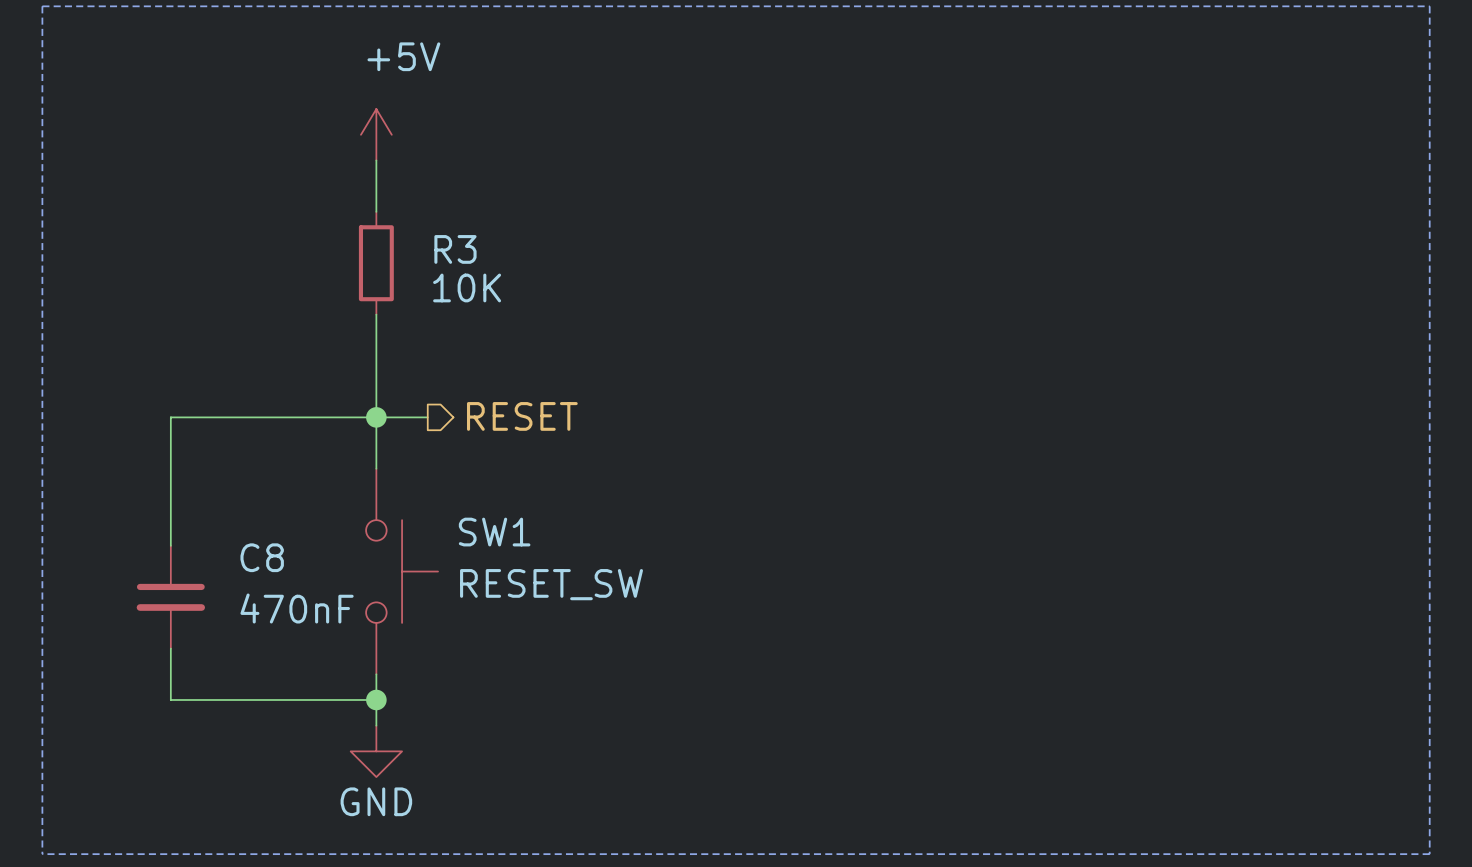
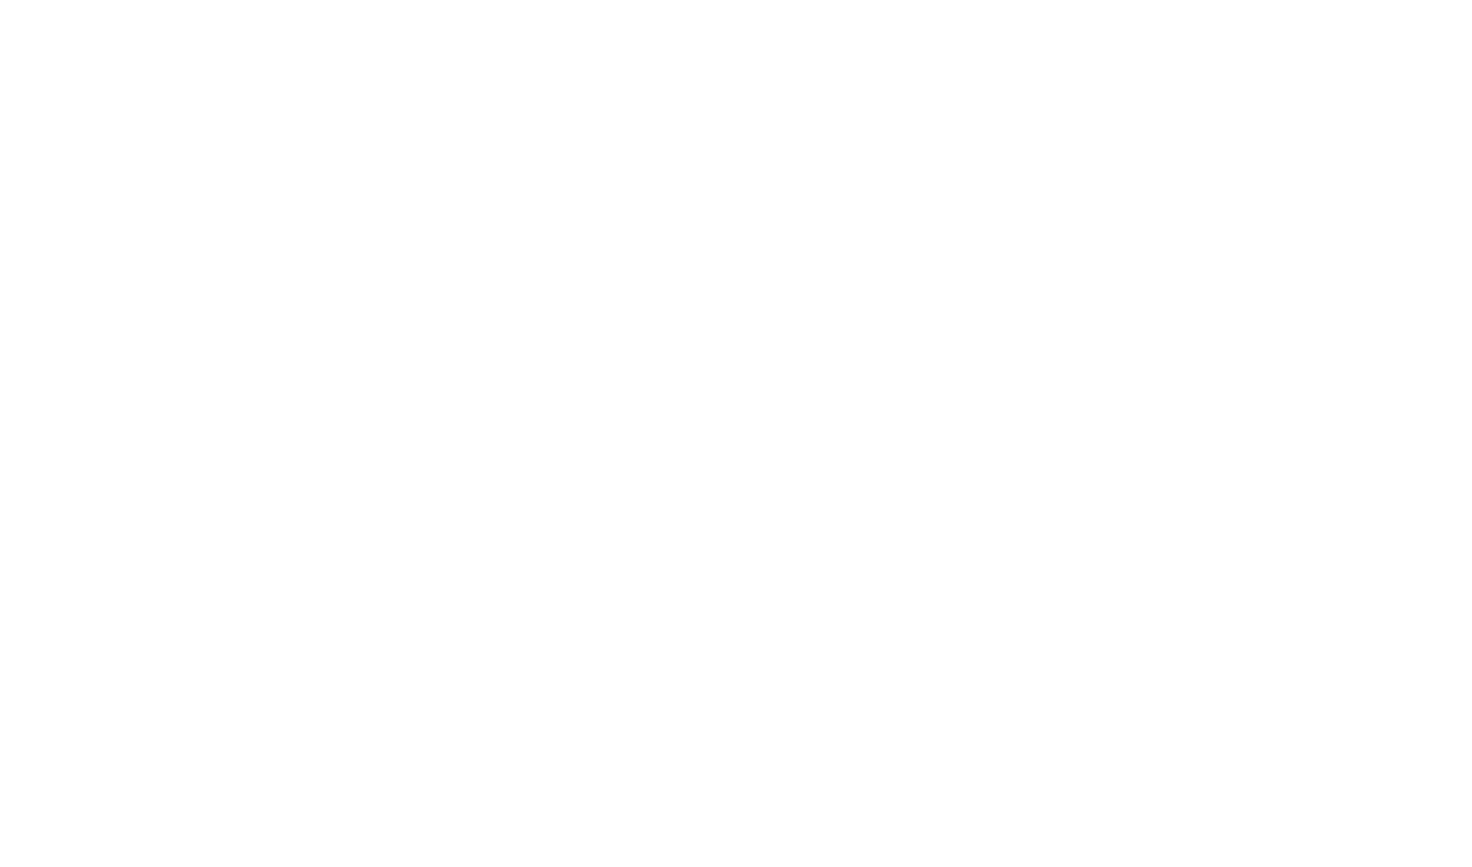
line: (42, 6) (1429, 6) (1429, 854) (42, 854) (42, 6) -> none
power symbol: +5V (376, 134) -> none
wire: (376, 160) (376, 211) -> none
R3: 10K (376, 263) -> none
wire: (376, 314) (376, 468) -> none
hierarchical label: RESET (522, 416) -> none
junction: (376, 417) -> none
wire: (427, 417) (170, 417) (170, 545) -> none
SW1: RESET_SW (402, 571) -> none
C8: 470nF (170, 597) -> none
wire: (170, 648) (170, 699) (376, 699) -> none
wire: (376, 674) (376, 725) -> none
junction: (376, 699) -> none
power symbol: GND (376, 751) -> none

